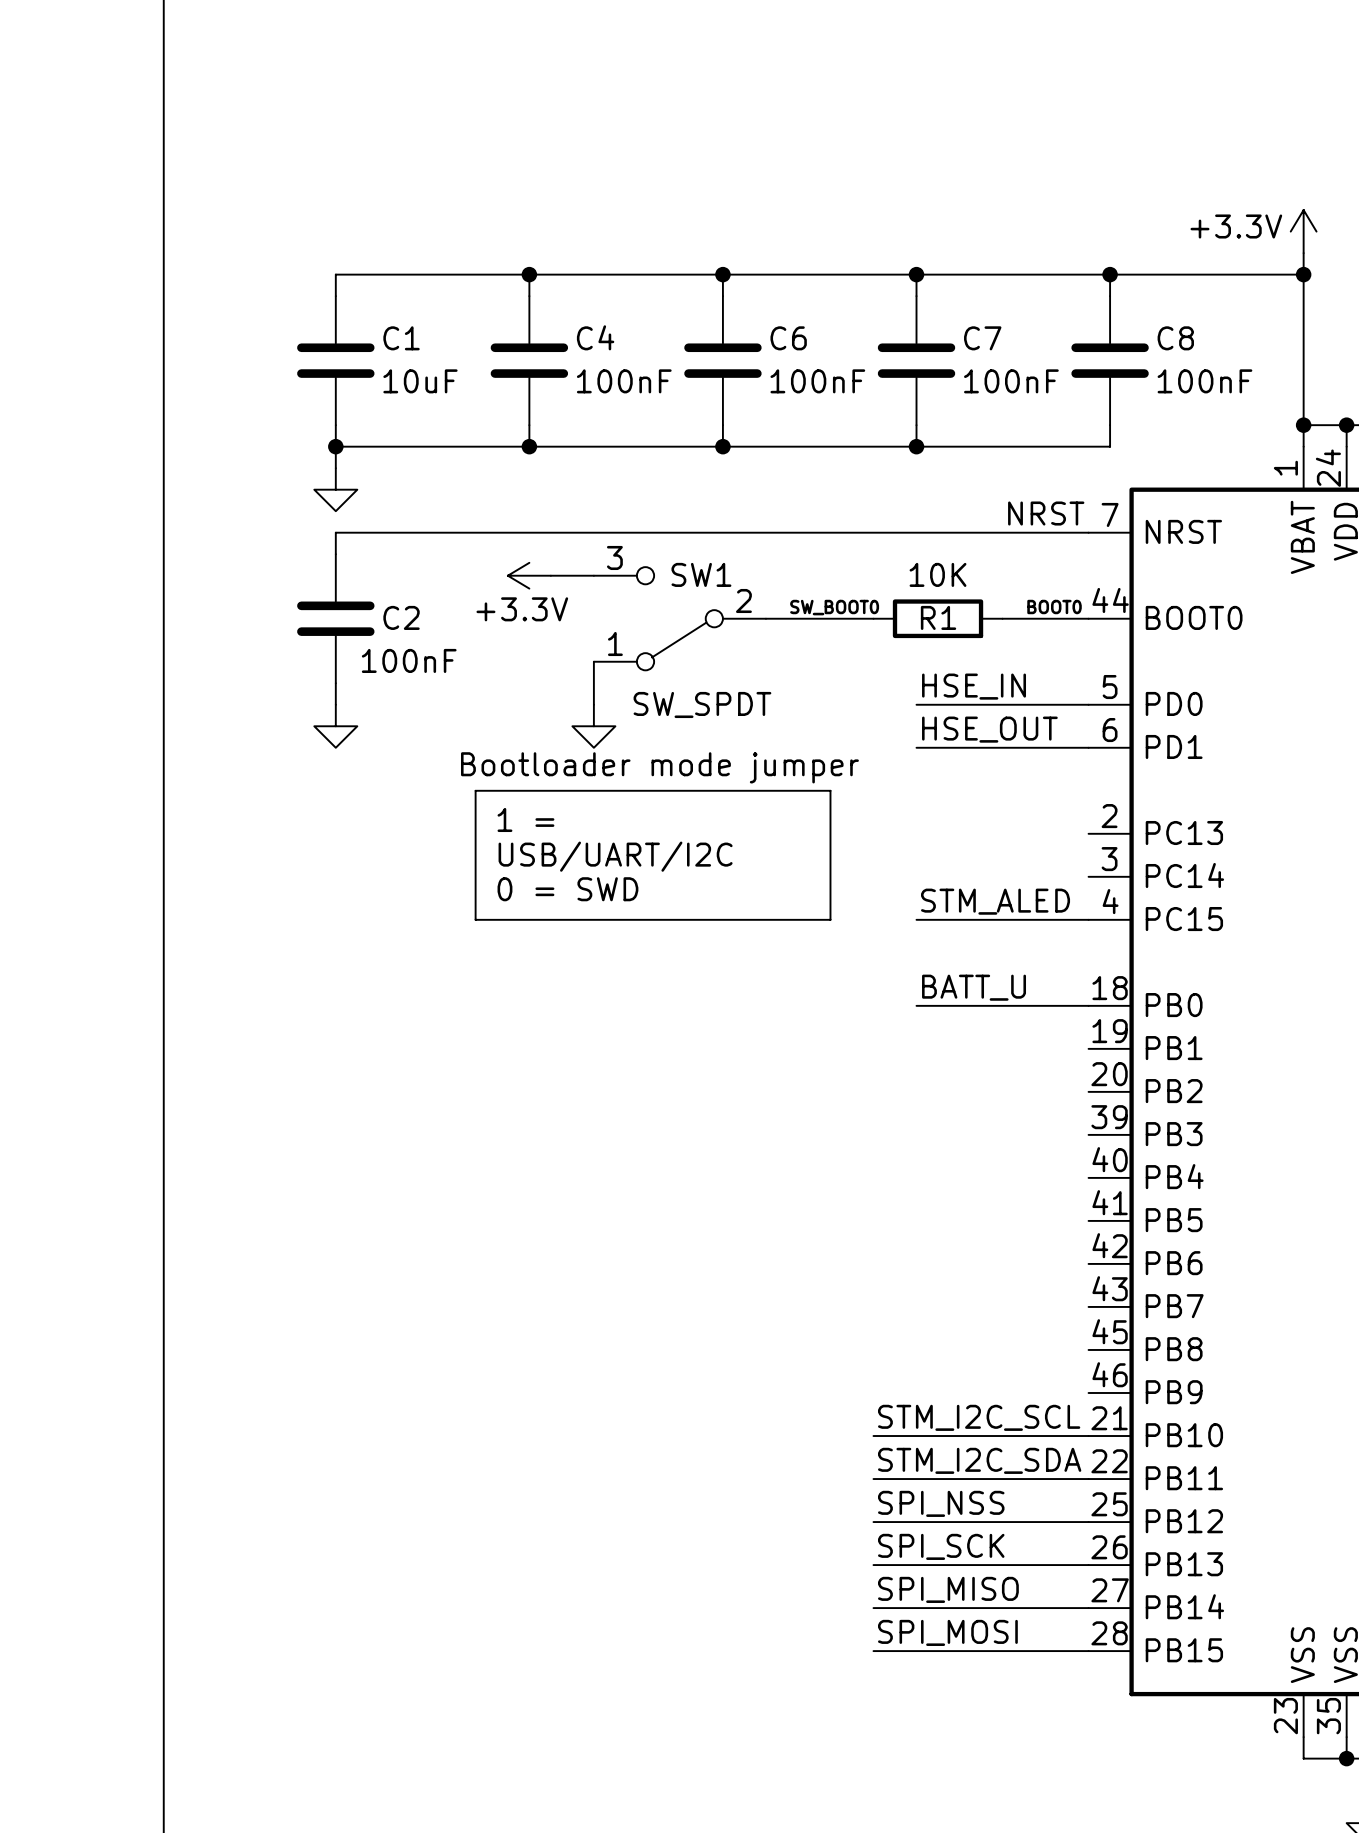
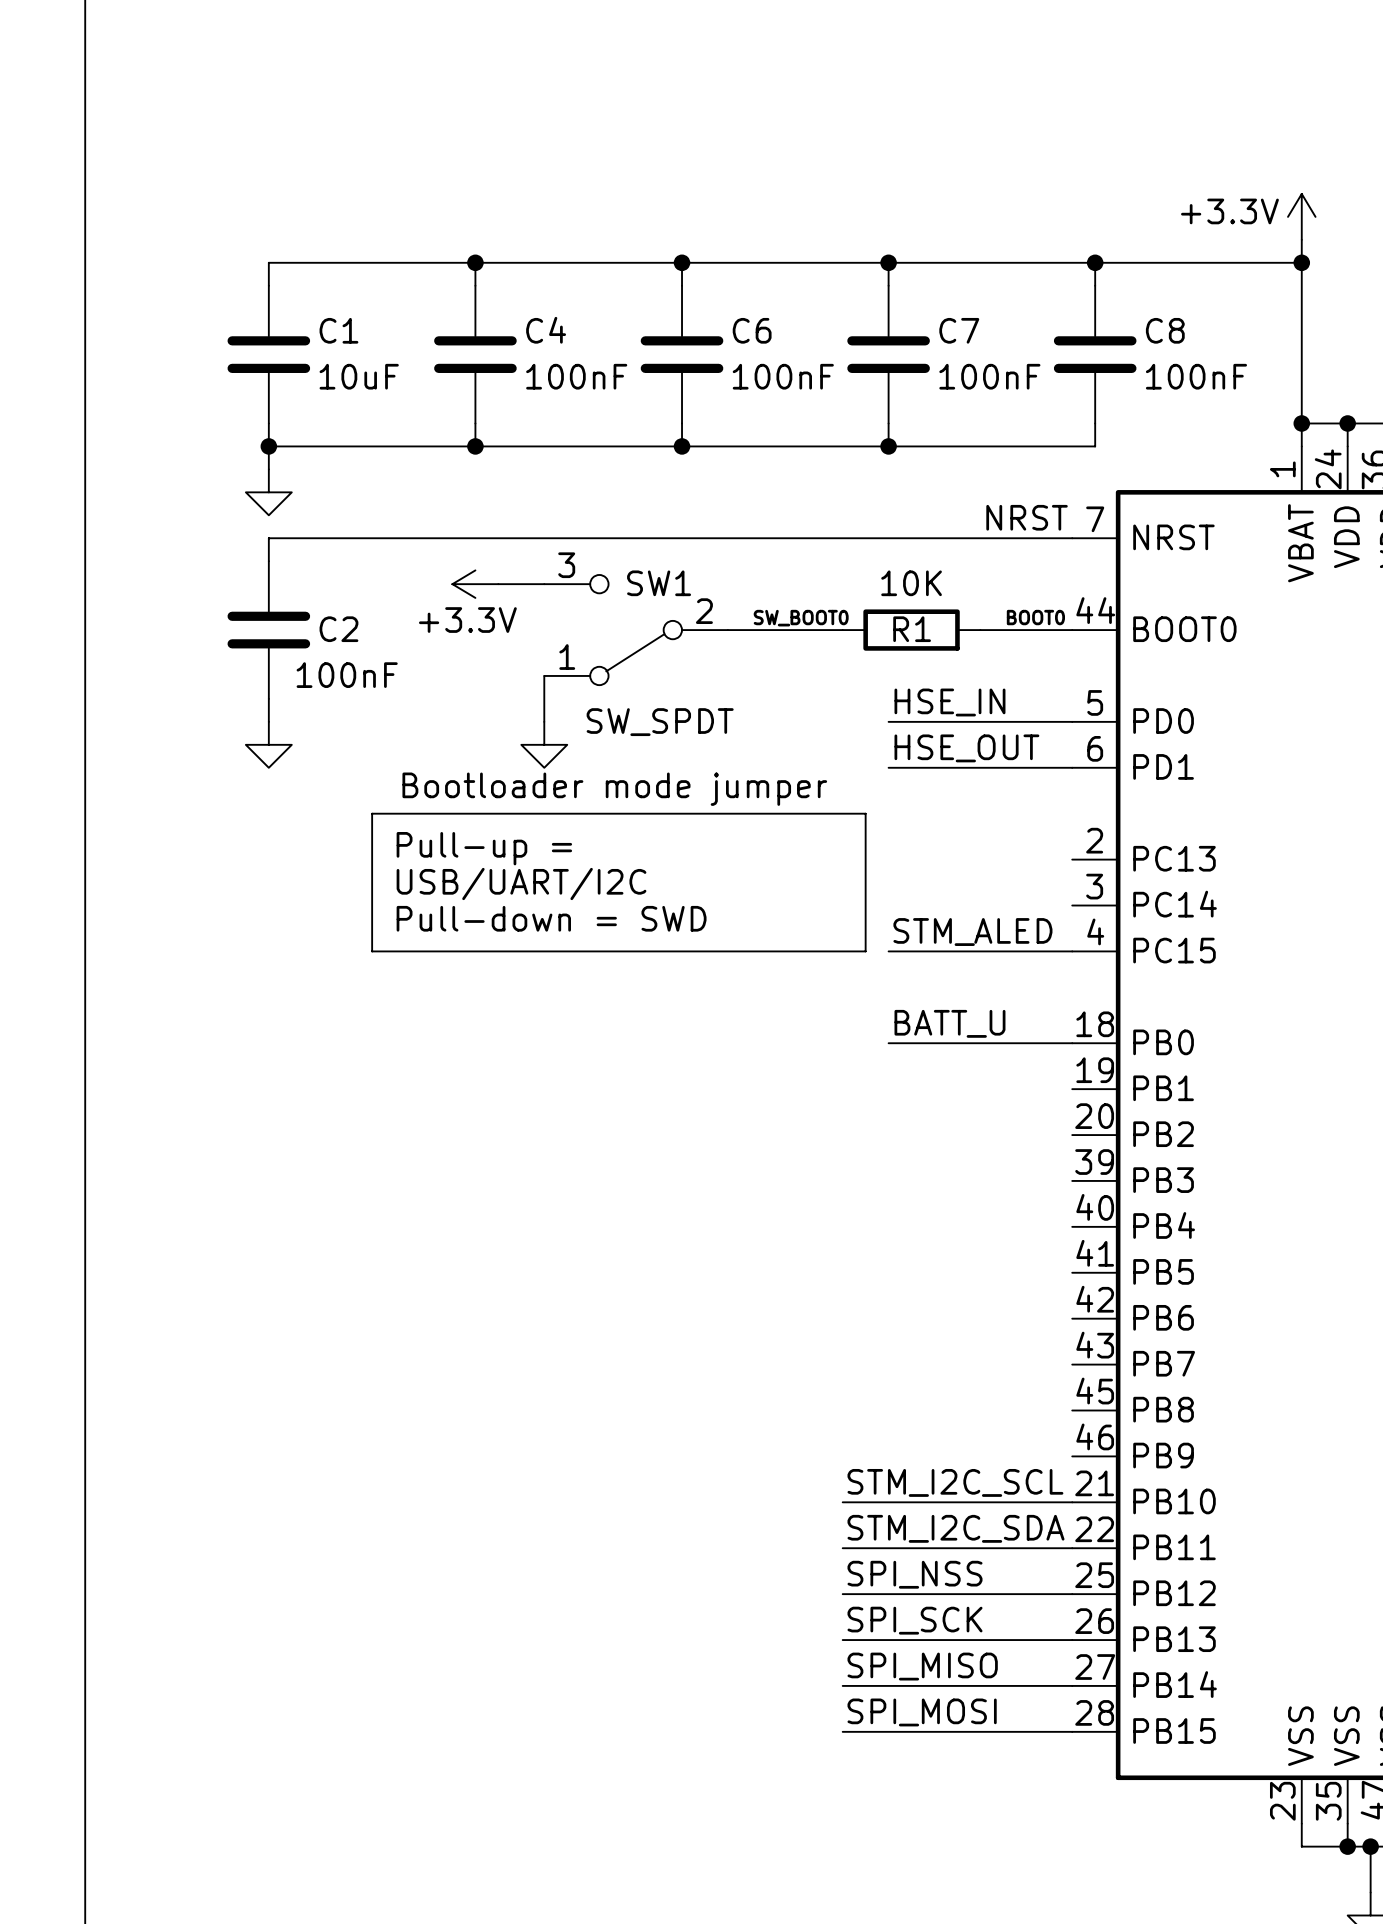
line: (475, 790) (475, 919) -> (418, 813) (372, 813) (372, 951) (418, 951)
line: (830, 790) (830, 919) -> (796, 813) (865, 813) (865, 951) (796, 951)
text: 1 = (525, 819) -> none
text: none -> Pull-up = (484, 848)
text position: USB/UART/I2C (615, 856) -> USB/UART/I2C (521, 884)
text: 0 = SWD (567, 889) -> none
text: none -> Pull-down = SWD (551, 918)

